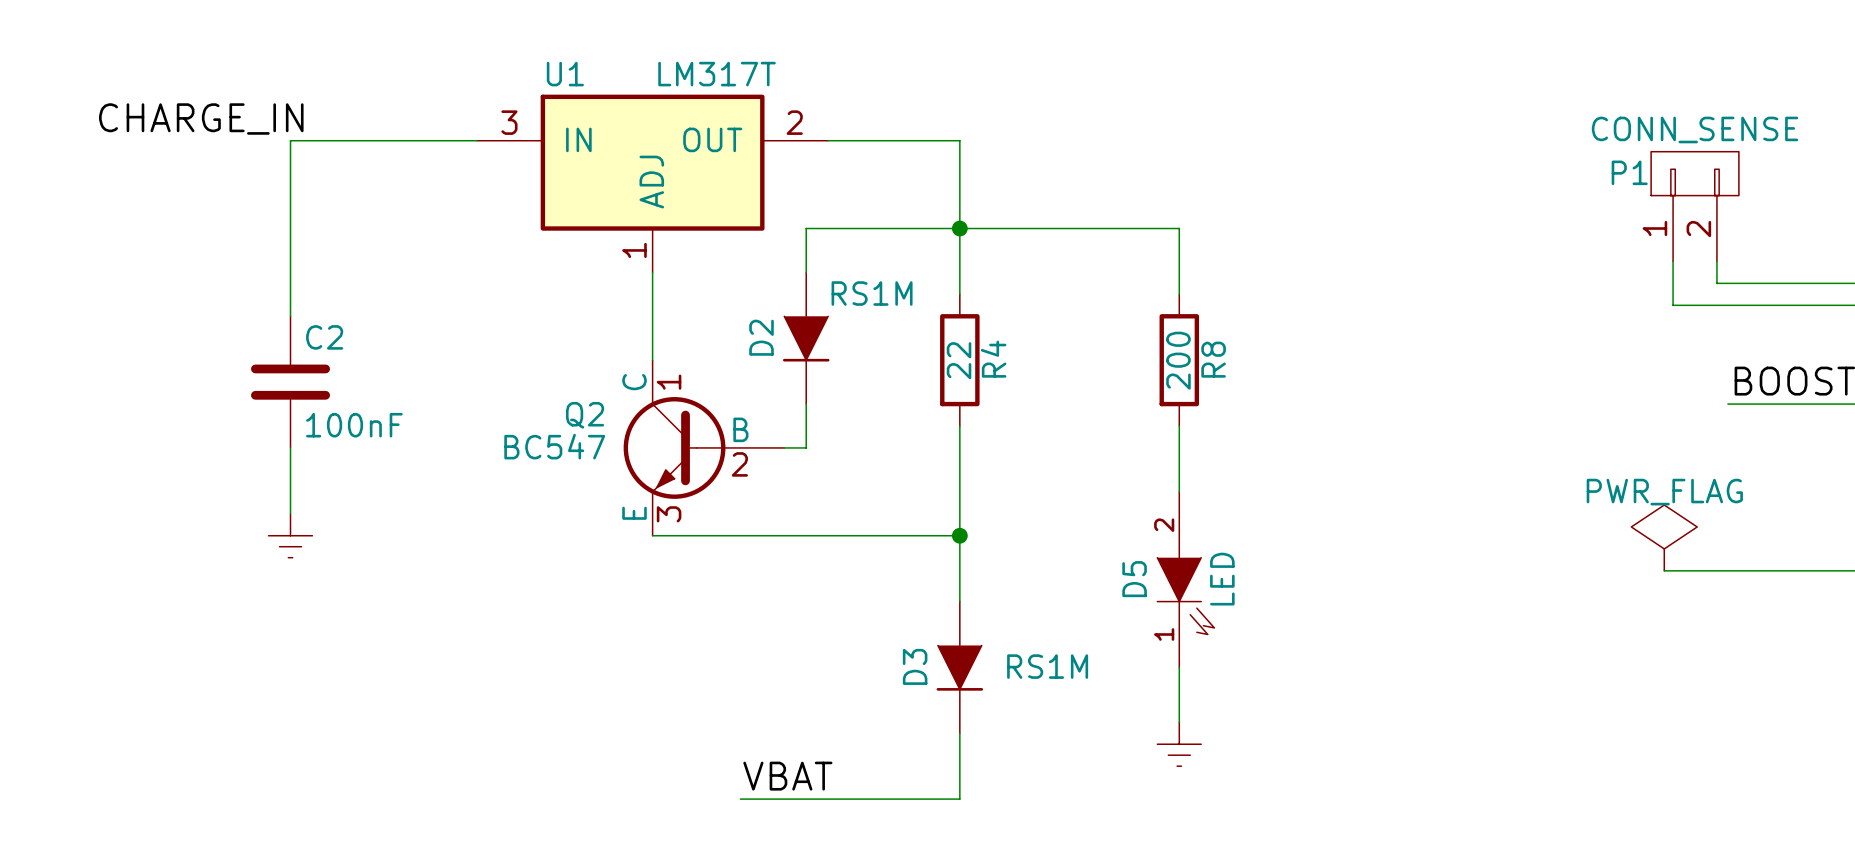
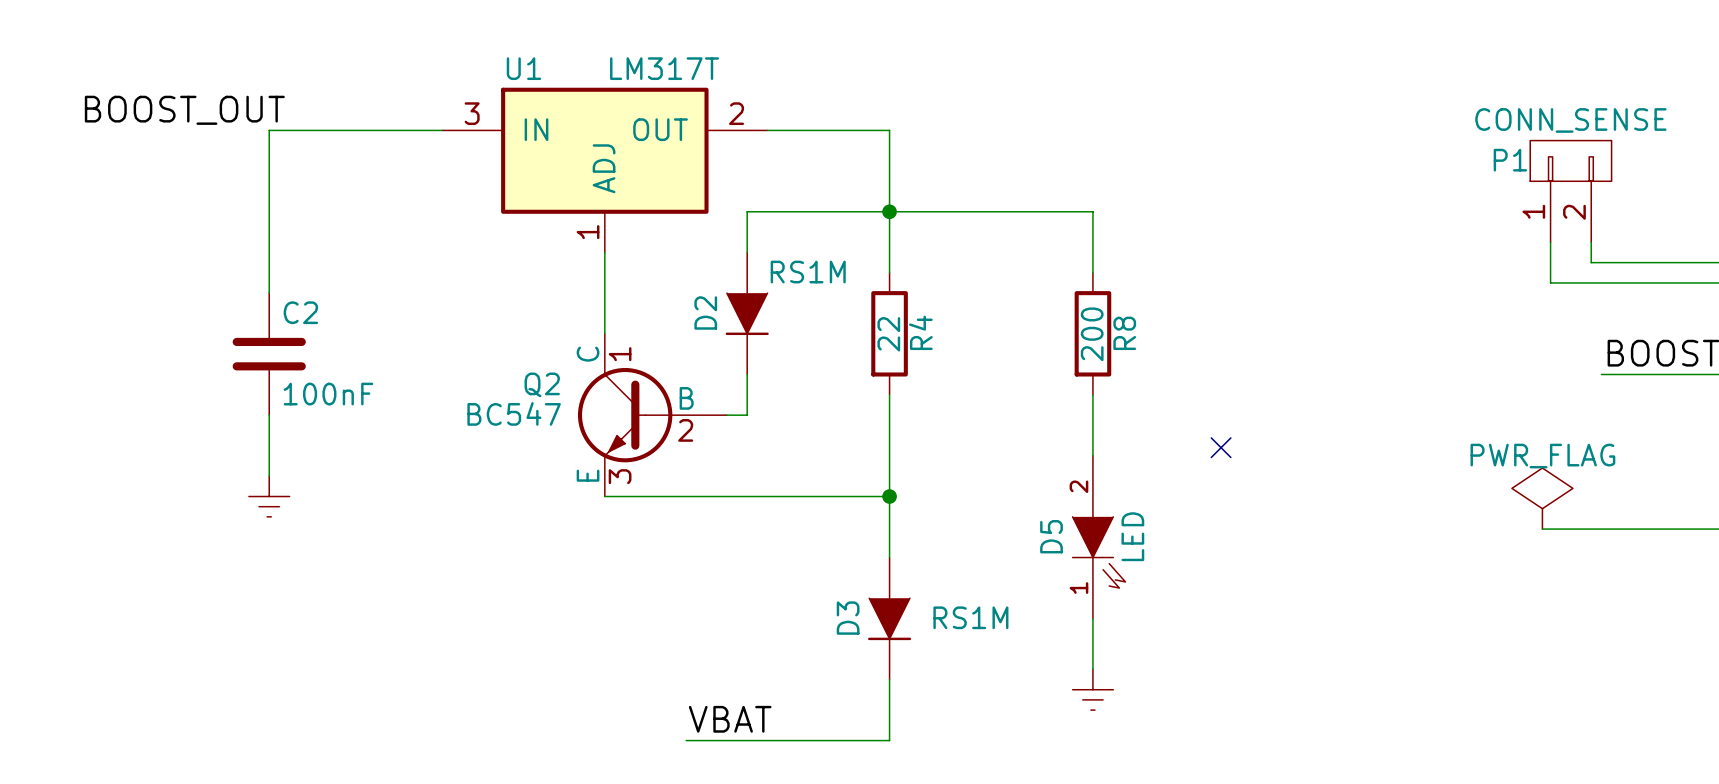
label: CHARGE_IN (201, 119) -> BOOST_OUT (184, 110)
no-connect mark: none -> (1221, 447)

